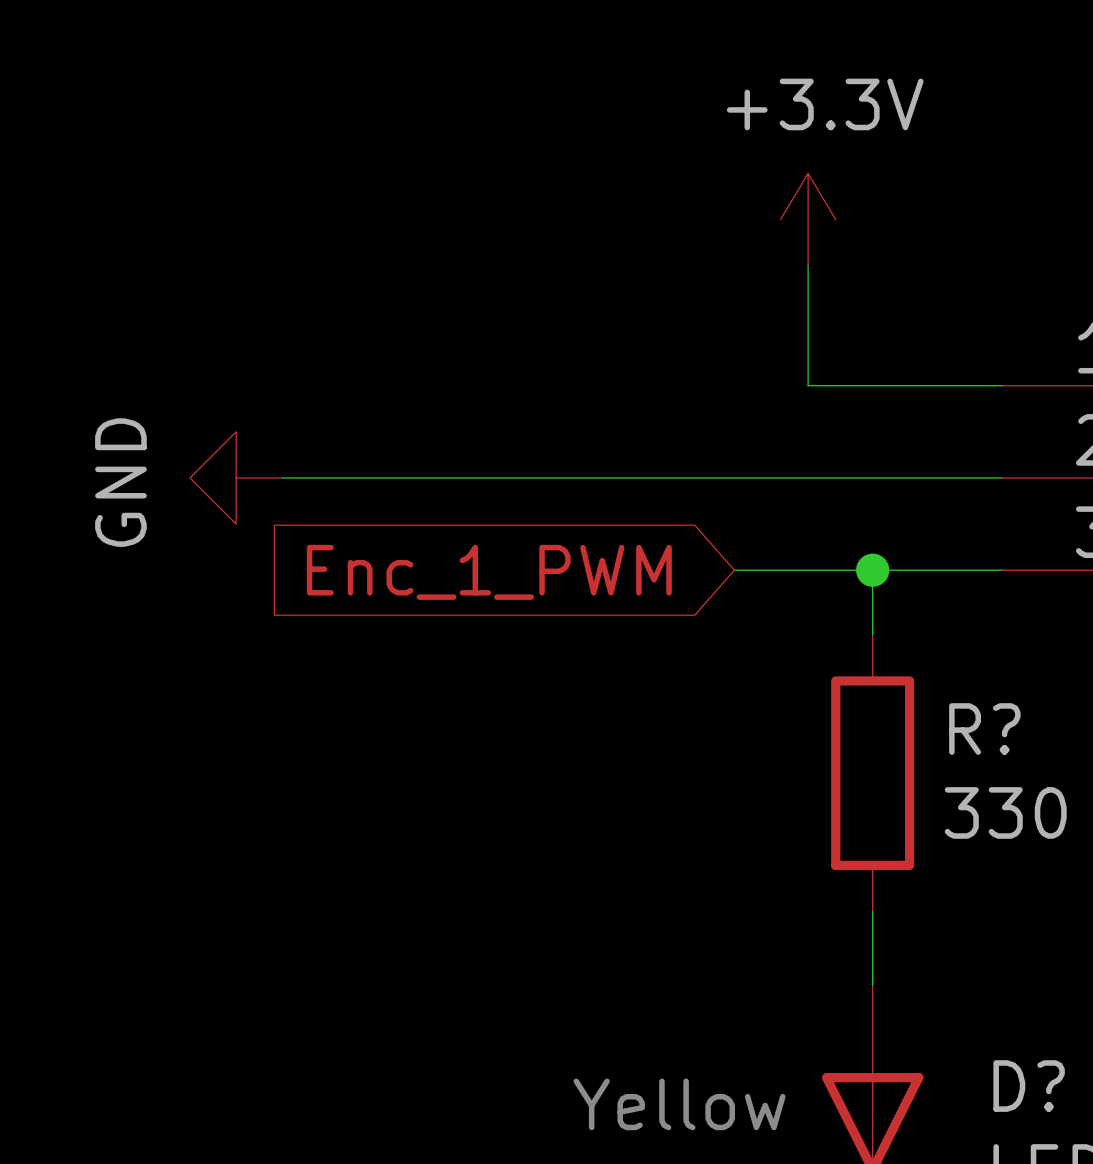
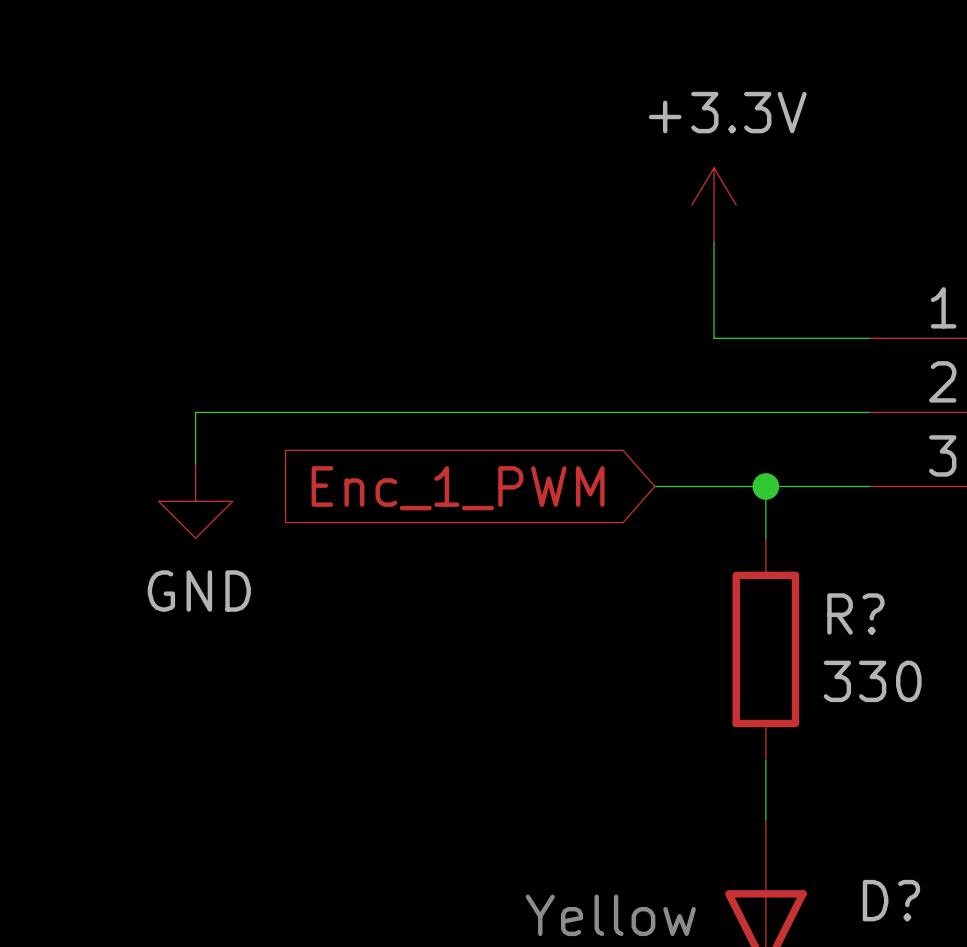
power symbol rotation: 0° (236, 477) -> 90° counterclockwise (195, 501)
power symbol position: GND (236, 477) -> GND (195, 501)
wire: none -> (291, 412) (195, 412) (195, 464)

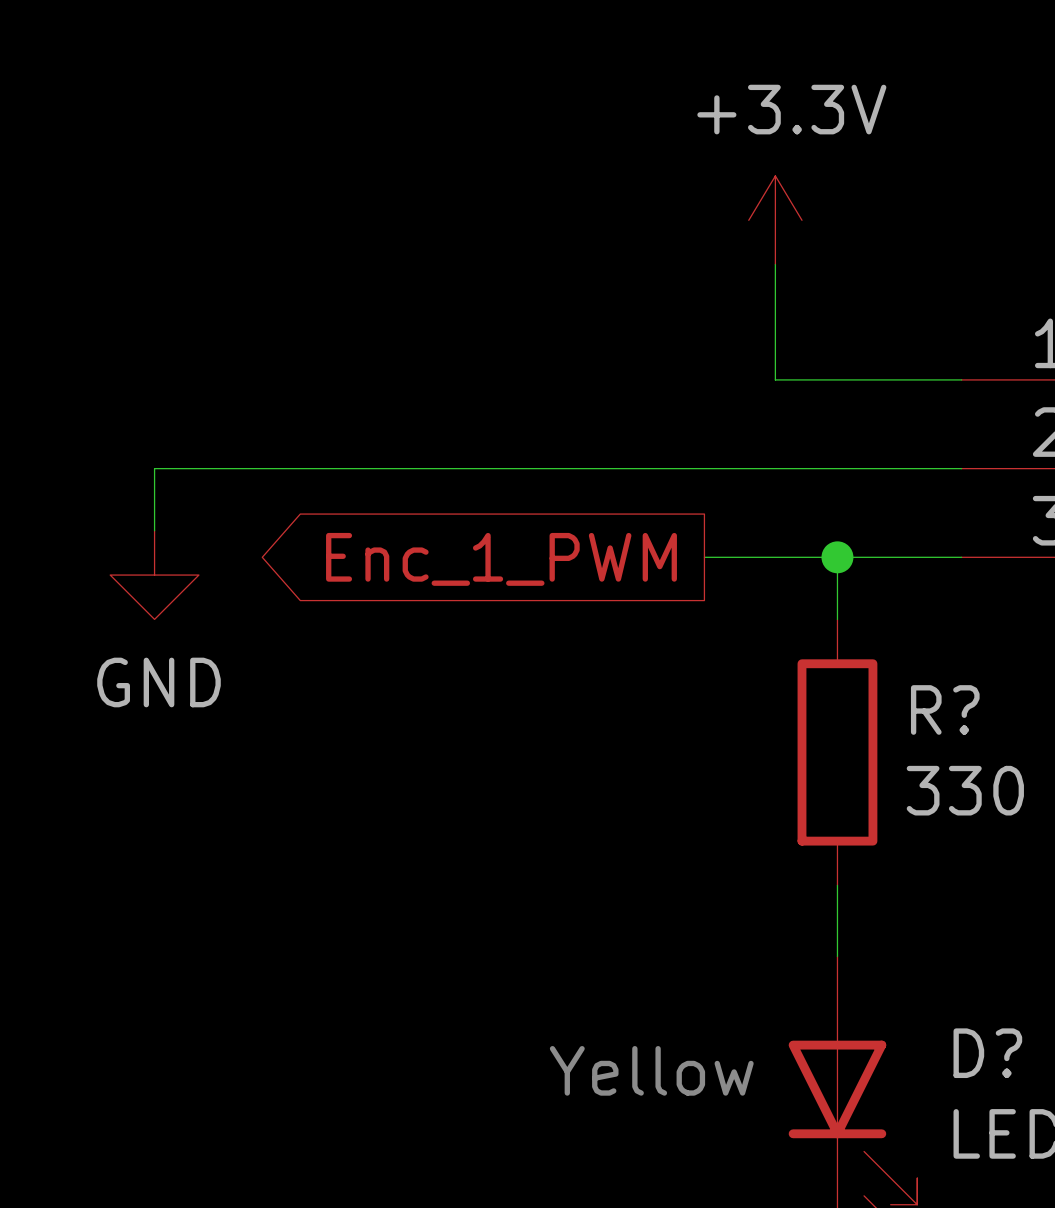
global label shape: input (458, 488) -> output (501, 559)

